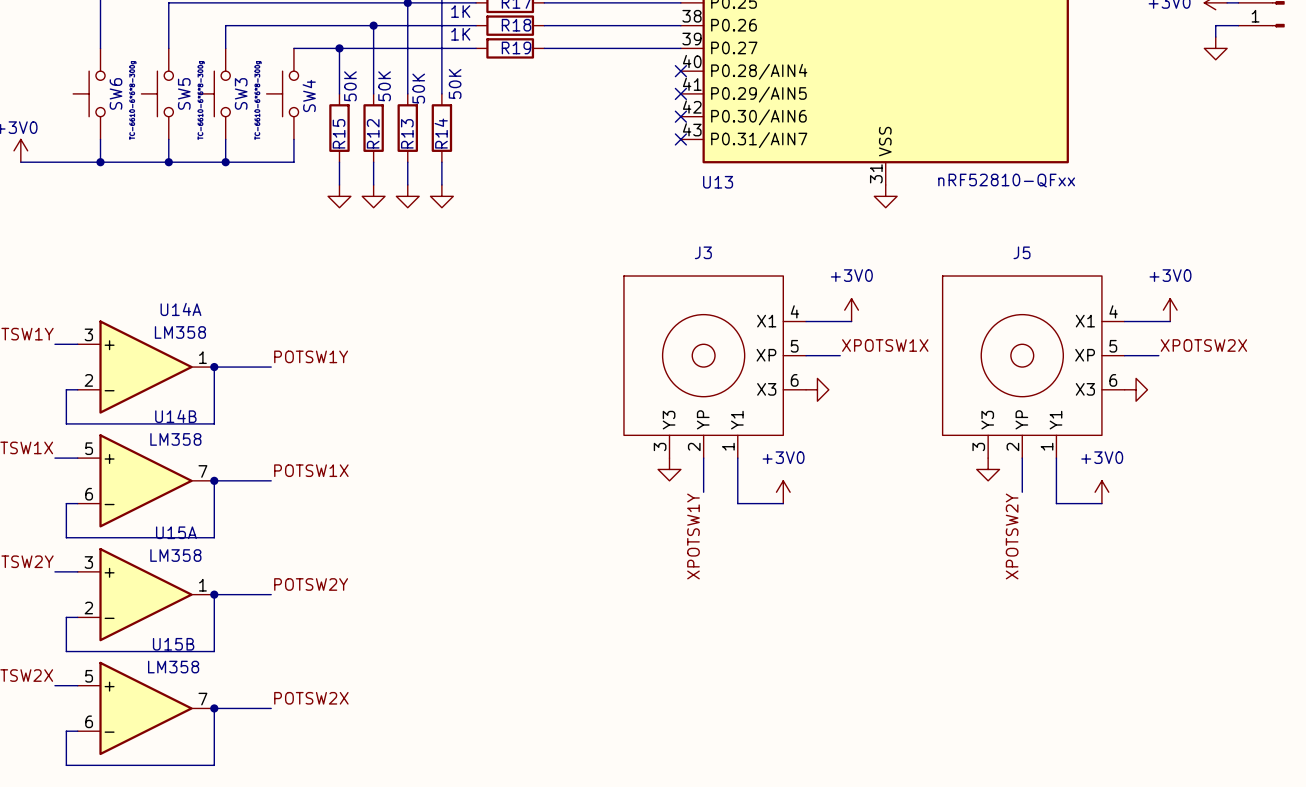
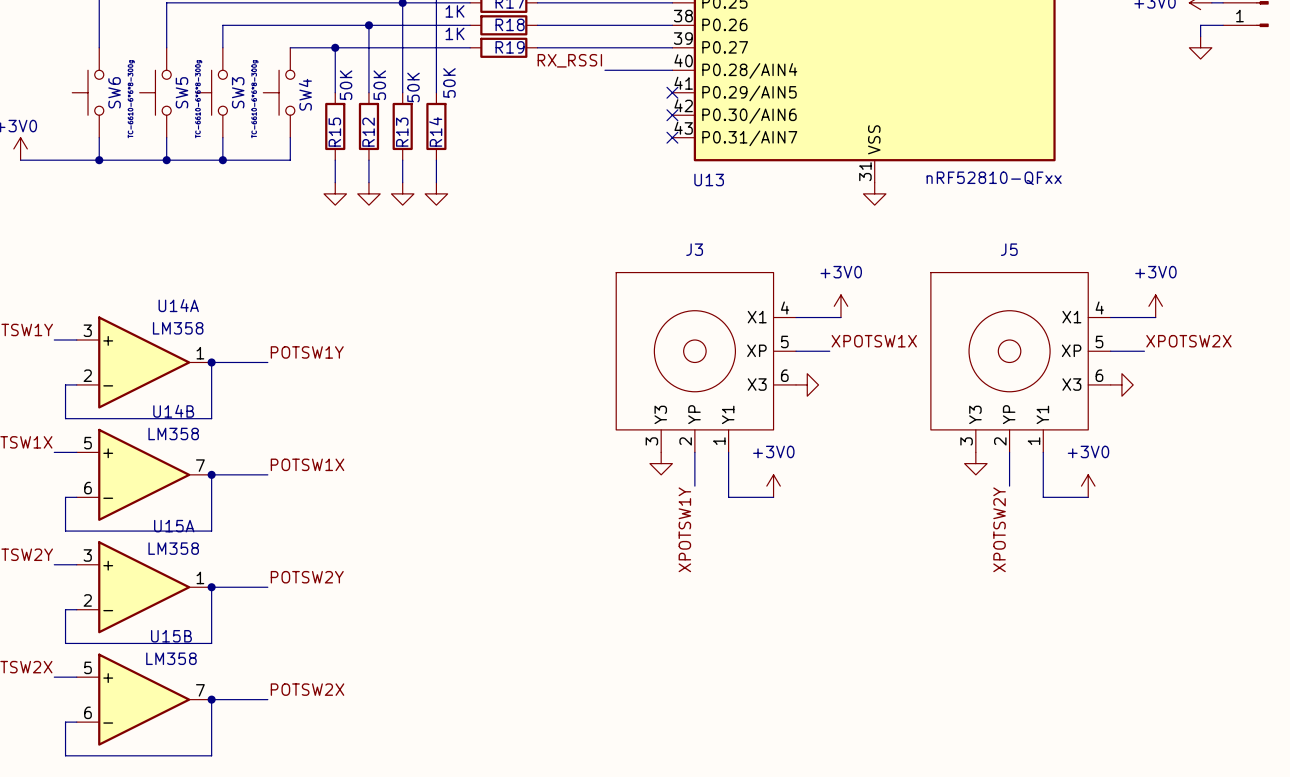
label: none -> RX_RSSI (569, 60)
wire: none -> (604, 70) (672, 70)
no-connect mark: (680, 71) -> none

